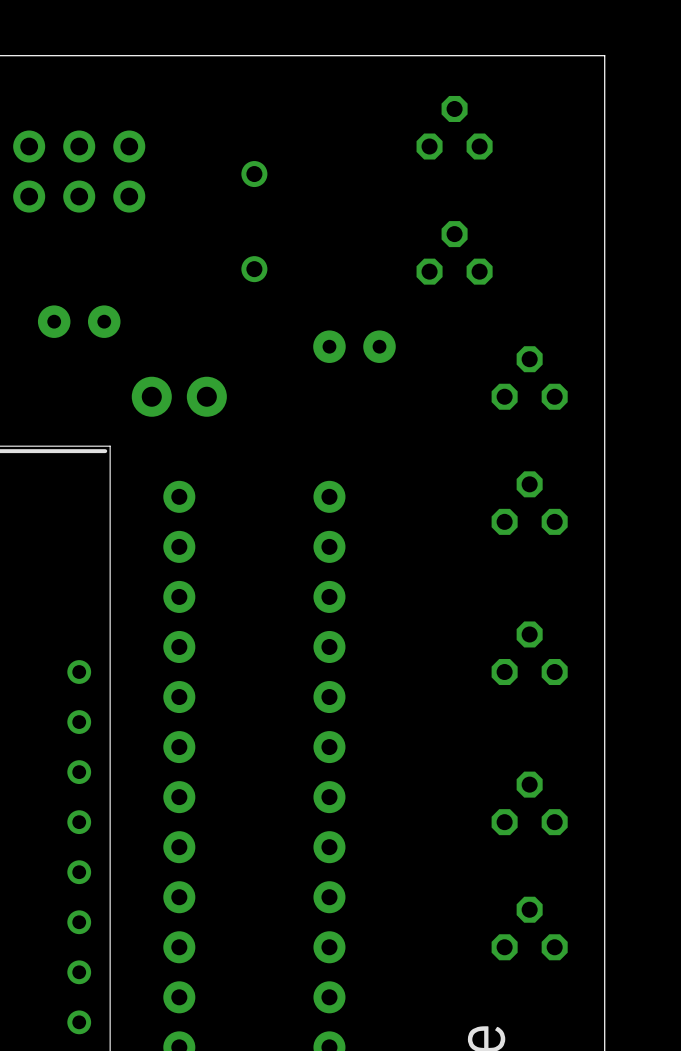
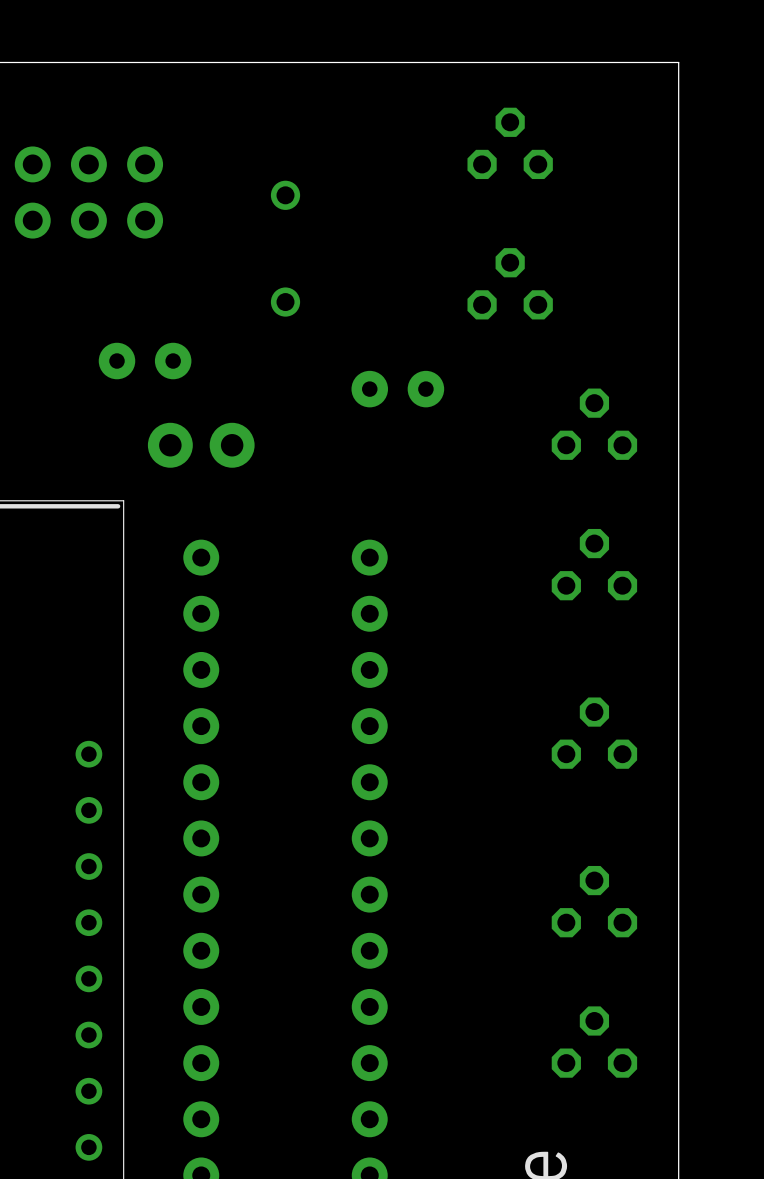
part position: (79, 321) -> (145, 361)

